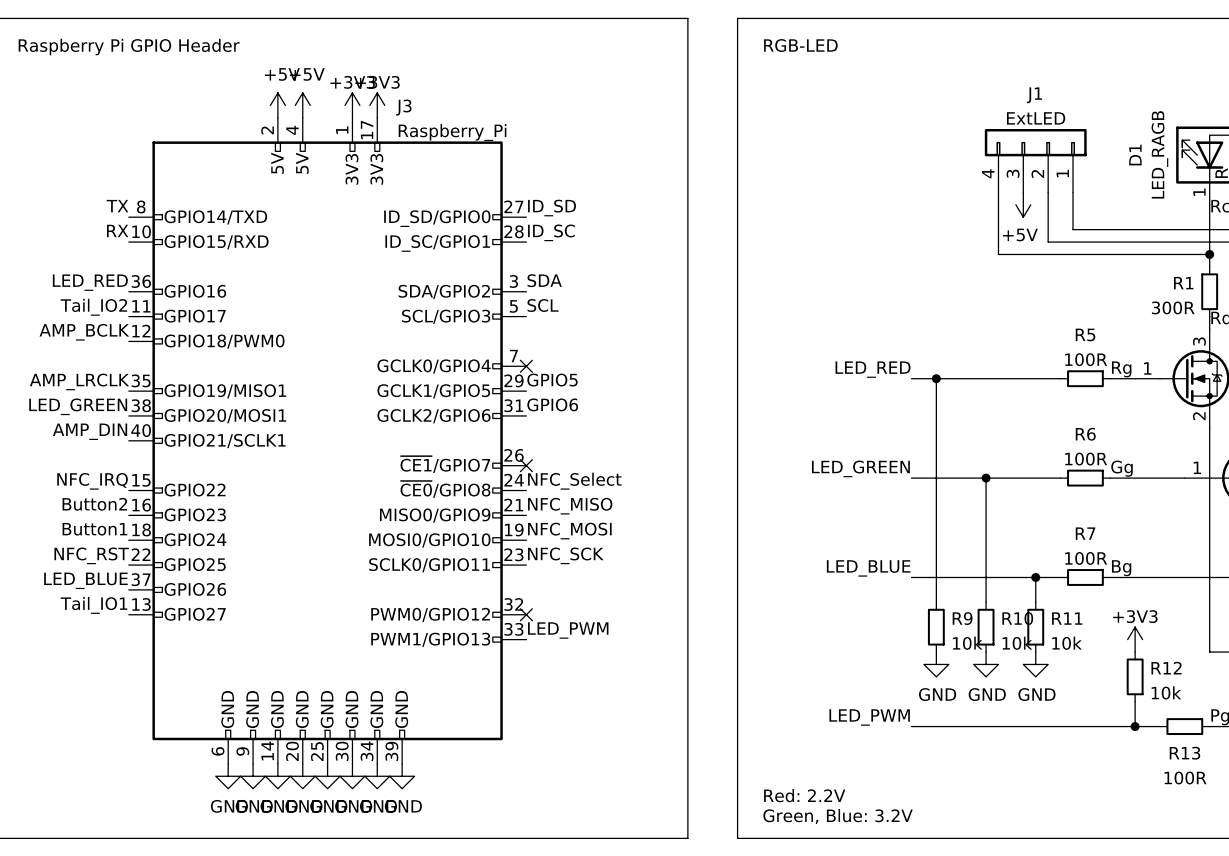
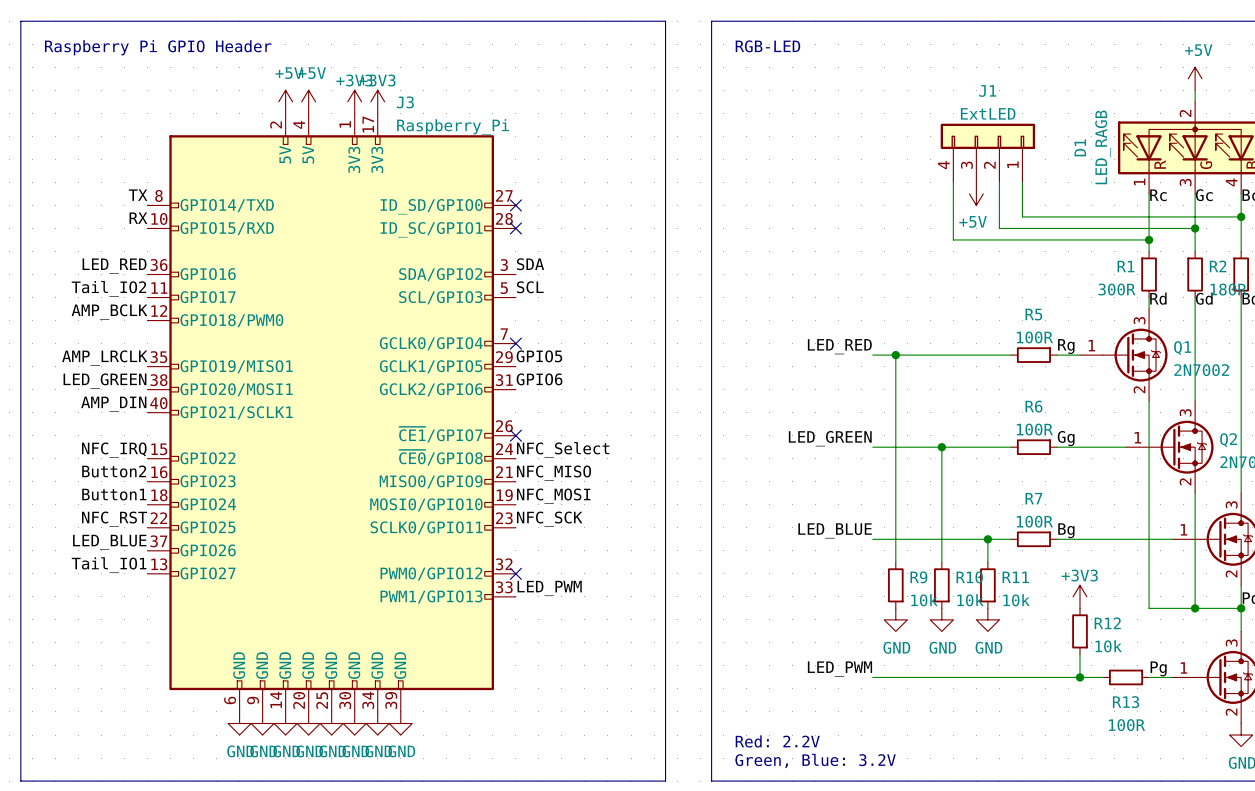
label: ID_SD (552, 208) -> none
no-connect mark: none -> (515, 205)
label: ID_SC (551, 232) -> none
no-connect mark: none -> (515, 228)

